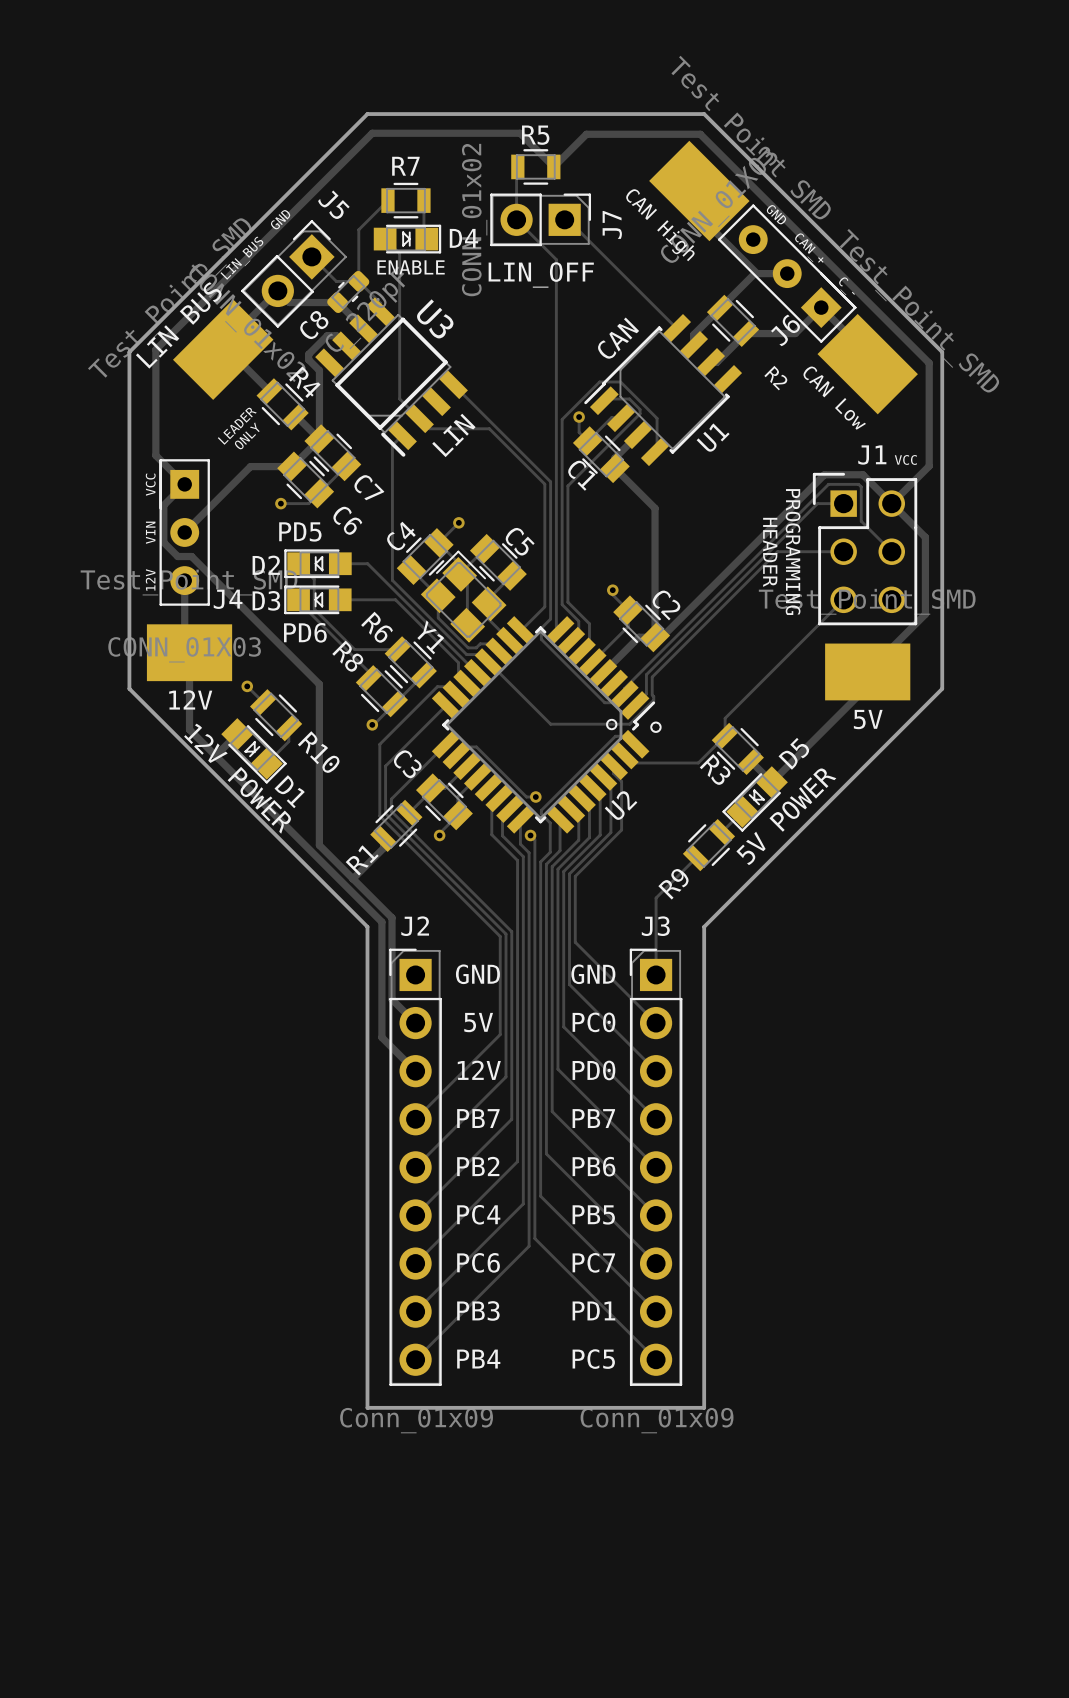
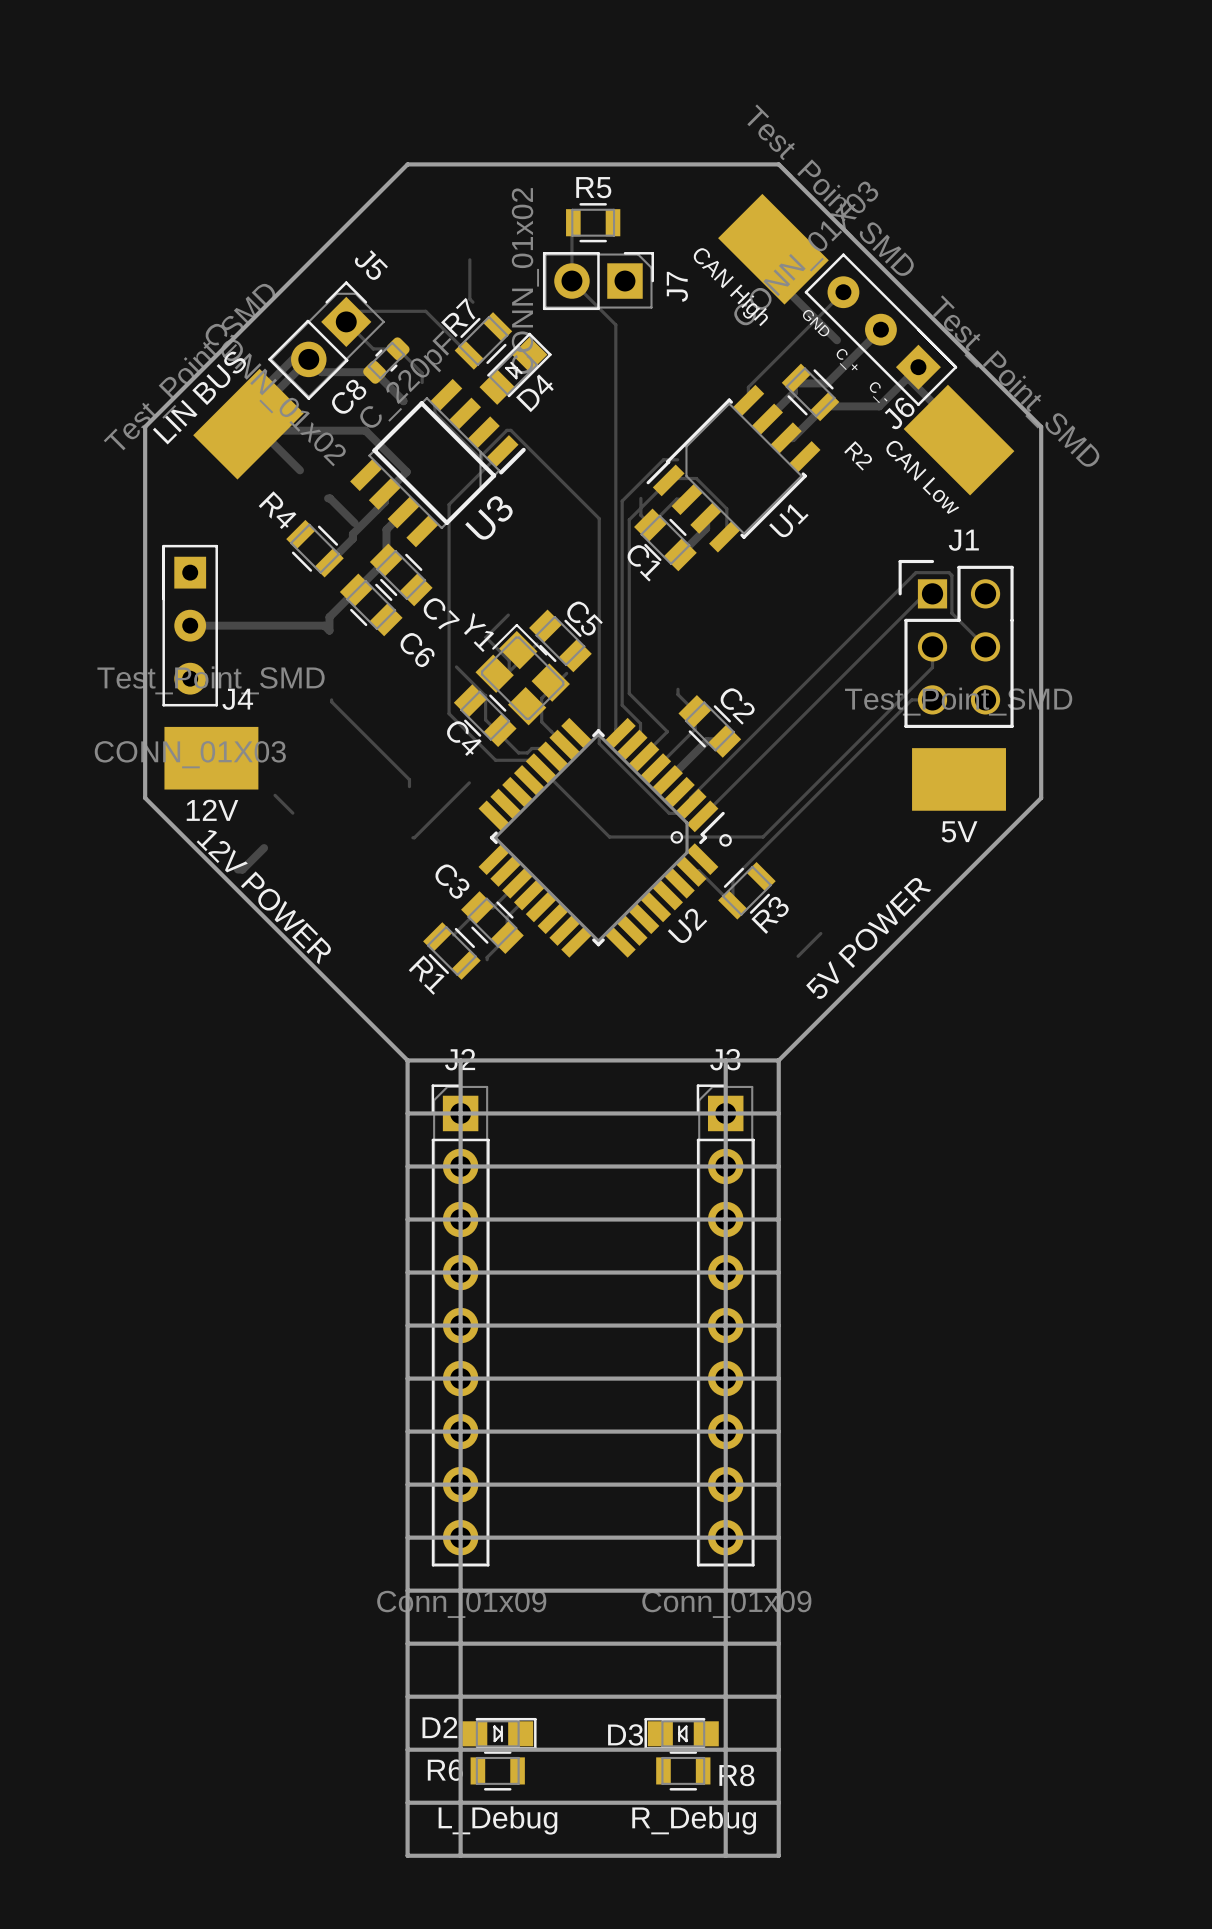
track: (387, 200) (358, 229) (358, 281) -> none
R7 rotation: 0° (405, 200) -> 45° counterclockwise (483, 340)
R7 position: (405, 200) -> (483, 340)
text position: GND (776, 214) -> GND (816, 323)
text: GND (280, 219) -> none
track: (564, 219) (568, 219) (676, 328) -> (843, 292) (748, 387) (748, 400)
D4 name position: D4 (463, 238) -> D4 (534, 393)
track: (385, 239) (399, 253) (399, 398) (429, 428) (489, 428) (544, 484) (544, 606) (521, 630) -> none
D4 rotation: 0° (407, 239) -> 45° counterclockwise (515, 368)
D4 position: (407, 239) -> (515, 368)
track: none -> (340, 311) (425, 311) (469, 354)
text: CAN_+ (809, 247) -> C_+ (847, 359)
text: LIN_BUS (241, 258) -> none
text: ENABLE (411, 267) -> none
track: (787, 273) (754, 273) (693, 334) (693, 345) -> (880, 329) (827, 383) (793, 383) (793, 392) (767, 419)
J6 position: (787, 273) -> (880, 329)
text: LIN_OFF (541, 274) -> none
track: none -> (303, 348) (239, 412) (257, 430) (365, 430) (406, 471) (384, 493) (384, 501) (352, 534) (352, 538) (329, 562)
text position: C_- (846, 286) -> C_- (878, 392)
U3 name position: U3 (435, 318) -> U3 (489, 517)
J6 name position: J6 (785, 330) -> J6 (899, 413)
text: CAN (618, 338) -> none
track: (346, 345) (336, 335) (327, 335) (308, 354) (308, 359) (319, 370) (319, 439) (292, 466) (250, 466) (184, 532) -> none
U3 rotation: 0° (391, 377) -> 90° counterclockwise (437, 463)
track: (612, 381) (620, 381) (657, 418) (657, 426) -> (708, 490) (726, 508)
R4 name position: R4 (304, 382) -> R4 (277, 510)
track: (453, 384) (550, 481) (550, 619) (541, 628) -> (446, 394) (434, 406) (434, 412) (481, 459) (481, 455) (506, 430) (510, 430) (599, 518) (599, 731)
track: none -> (668, 480) (629, 519) (629, 693) (667, 731) (643, 755)
R4 position: (282, 404) -> (314, 548)
track: (640, 409) (640, 413) (567, 485) (567, 602) (589, 623) (589, 643) (581, 651) -> none
via: (579, 417) -> none
text: LEADER (237, 426) -> none
track: none -> (403, 512) (386, 529) (386, 560) (329, 617) (329, 630) (324, 625) (190, 625)
track: (638, 434) (614, 458) (614, 468) (655, 508) (655, 637) (661, 637) (824, 474) (862, 474) (925, 537) (925, 614) (867, 671) (867, 686) (771, 782) (750, 761) -> (706, 517) (706, 528) (680, 554)
text: ONLY (247, 435) -> none
track: (402, 435) (392, 445) (392, 580) (466, 654) -> (502, 451) (449, 504) (449, 713) (495, 760) (516, 760)
text: LIN (453, 435) -> none
C7 position: (332, 452) -> (401, 574)
text: VCC (905, 459) -> none
track: (346, 466) (308, 503) (280, 503) -> none
C6 position: (305, 479) -> (371, 604)
text: VCC (150, 484) -> none
via: (280, 503) -> none
track: (836, 503) (817, 503) (646, 674) (646, 694) -> (925, 593) (715, 803)
track: (891, 503) (929, 466) (929, 363) (700, 134) (586, 134) (553, 166) (520, 133) (372, 133) (155, 349) (155, 455) (184, 484) (163, 505) (163, 542) (177, 556) (191, 556) (319, 684) (319, 845) (392, 917) (392, 999) (415, 1023) -> none
via: (458, 522) -> none
text: PD5 (300, 531) -> none
text: VIN (150, 532) -> none
J4 position: (184, 532) -> (190, 625)
C4 name position: C4 (401, 536) -> C4 (464, 738)
track: (843, 551) (777, 551) (652, 677) (653, 700) (629, 724) -> (932, 646) (932, 667) (763, 836) (696, 836)
text: HEADER (770, 552) -> none
text: PROGRAMMING (793, 552) -> none
C4 rotation: 0° (425, 556) -> 90° clockwise (485, 715)
C4 position: (425, 556) -> (485, 715)
C5 position: (498, 562) -> (560, 640)
track: (298, 563) (314, 579) (314, 609) (354, 649) (398, 649) -> none
D2 rotation: 0° (317, 563) -> 180° (499, 1733)
D2 position: (317, 563) -> (499, 1733)
track: (340, 563) (367, 563) (478, 673) -> none
track: (459, 574) (467, 582) (467, 625) -> none
text: 12V (150, 579) -> none
track: (184, 580) (184, 647) (189, 652) (189, 729) (381, 922) (381, 1037) (415, 1071) -> none
via: (612, 590) -> none
Y1 position: (463, 596) -> (522, 674)
D3 position: (317, 599) -> (681, 1733)
track: (340, 599) (395, 599) (458, 662) (458, 674) (467, 684) -> none
track: (843, 599) (725, 718) (725, 736) (698, 763) (632, 763) (624, 754) -> (932, 699) (911, 699) (732, 878) (732, 904) (699, 870) (690, 870)
text: PD6 (305, 632) -> none
Y1 name position: Y1 (430, 637) -> Y1 (479, 632)
R8 name position: R8 (347, 656) -> R8 (736, 1775)
R6 rotation: 0° (410, 662) -> 45° counterclockwise (497, 1770)
R6 position: (410, 662) -> (497, 1770)
via: (247, 686) -> none
R8 rotation: 0° (381, 691) -> 45° counterclockwise (683, 1770)
R8 position: (381, 691) -> (683, 1770)
track: (456, 694) (448, 686) (437, 686) (379, 744) (379, 816) (500, 936) (500, 1034) (415, 1119) -> none
track: (446, 705) (385, 766) (385, 813) (506, 934) (506, 1076) (415, 1167) -> none
R10: (276, 715) -> none
via: (372, 724) -> none
track: (288, 727) (288, 741) (266, 763) -> none
track: (446, 744) (391, 799) (391, 811) (511, 931) (511, 1119) (415, 1215) -> none
track: (635, 744) (627, 736) (615, 736) (541, 810) (541, 814) (550, 822) (550, 852) (540, 861) (540, 1196) (656, 1311) -> none
R3 rotation: 0° (737, 748) -> 90° clockwise (746, 890)
R3 position: (737, 748) -> (746, 890)
D1: (253, 750) -> none
track: (456, 754) (464, 746) (476, 746) (526, 797) (535, 797) -> none
track: (613, 765) (613, 773) (621, 781) (621, 830) (575, 876) (575, 942) (656, 1023) -> none
R3 name position: R3 (715, 769) -> R3 (770, 915)
track: (602, 776) (610, 784) (610, 832) (569, 873) (569, 984) (656, 1071) -> none
track: (592, 787) (600, 795) (600, 835) (563, 871) (563, 1026) (656, 1119) -> none
track: (499, 797) (491, 805) (491, 834) (517, 860) (517, 1161) (415, 1263) -> none
via: (535, 797) -> none
track: (581, 797) (589, 805) (589, 837) (557, 869) (557, 1069) (656, 1167) -> none
D5: (755, 798) -> none
track: (510, 808) (502, 816) (502, 835) (523, 856) (523, 1203) (415, 1311) -> none
track: (570, 808) (578, 816) (578, 840) (552, 866) (552, 1111) (656, 1215) -> none
track: (521, 819) (520, 844) (529, 852) (529, 1246) (421, 1353) (415, 1353) -> none
track: (560, 819) (560, 850) (546, 864) (546, 1153) (656, 1263) -> none
R1 rotation: 0° (396, 825) -> 90° clockwise (451, 950)
via: (439, 835) -> none
track: (530, 835) (534, 839) (534, 1238) (649, 1353) (656, 1353) -> none
via: (530, 835) -> none
track: (383, 838) (383, 848) (352, 878) -> none
R9: (708, 845) -> none
track: (696, 857) (656, 898) (656, 974) -> none
board edge: none -> (407, 1060) (778, 1060)
board edge: none -> (460, 1060) (460, 1855)
board edge: none -> (725, 1060) (725, 1855)
board edge: none -> (407, 1113) (778, 1113)
text: GND (477, 974) -> none
text: GND (593, 974) -> none
text: 5V (478, 1022) -> none
text: PC0 (593, 1022) -> none
board edge: none -> (407, 1166) (778, 1166)
text: 12V (479, 1070) -> none
text: PD0 (593, 1070) -> none
board edge: none -> (407, 1219) (778, 1219)
text: PB7 (478, 1118) -> none
text: PB7 (593, 1118) -> none
board edge: none -> (407, 1272) (778, 1272)
text: PB2 (478, 1166) -> none
text: PB6 (593, 1166) -> none
board edge: none -> (407, 1325) (778, 1325)
text: PC4 (478, 1214) -> none
text: PB5 (593, 1214) -> none
board edge: none -> (407, 1378) (778, 1378)
text: PC6 (478, 1262) -> none
text: PC7 (593, 1262) -> none
board edge: none -> (407, 1431) (778, 1431)
text: PB3 (478, 1310) -> none
text: PD1 (593, 1310) -> none
board edge: none -> (407, 1484) (778, 1484)
board edge: none -> (407, 1537) (778, 1537)
text: PB4 (478, 1359) -> none
text: PC5 (593, 1359) -> none
board edge: none -> (407, 1590) (407, 1855) (778, 1855) (778, 1590)
board edge: none -> (407, 1643) (778, 1643)
board edge: none -> (407, 1696) (778, 1696)
board edge: none -> (407, 1749) (778, 1749)
board edge: none -> (407, 1802) (778, 1802)
text: none -> L_Debug (498, 1820)
text: none -> R_Debug (694, 1820)

